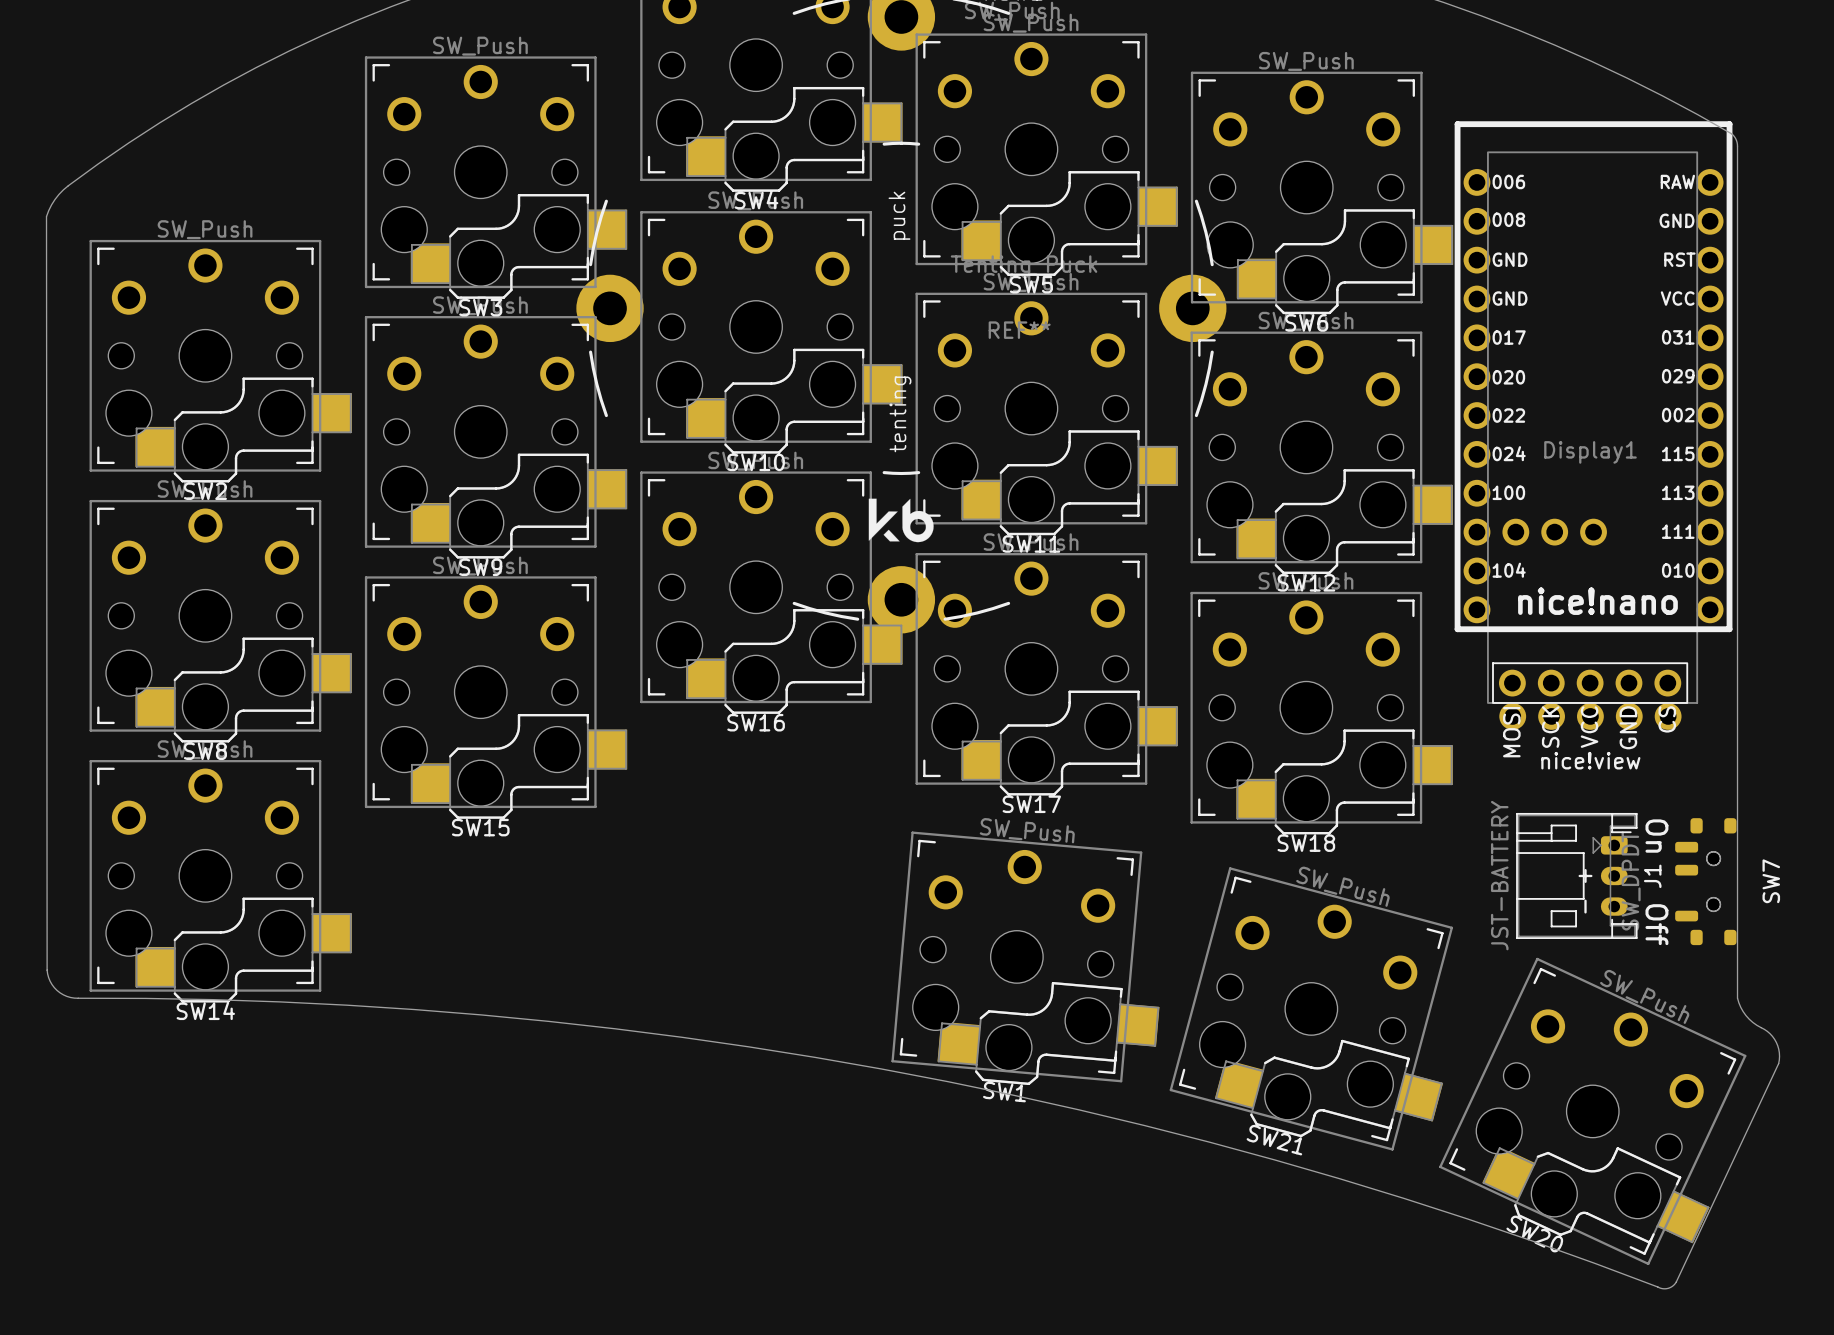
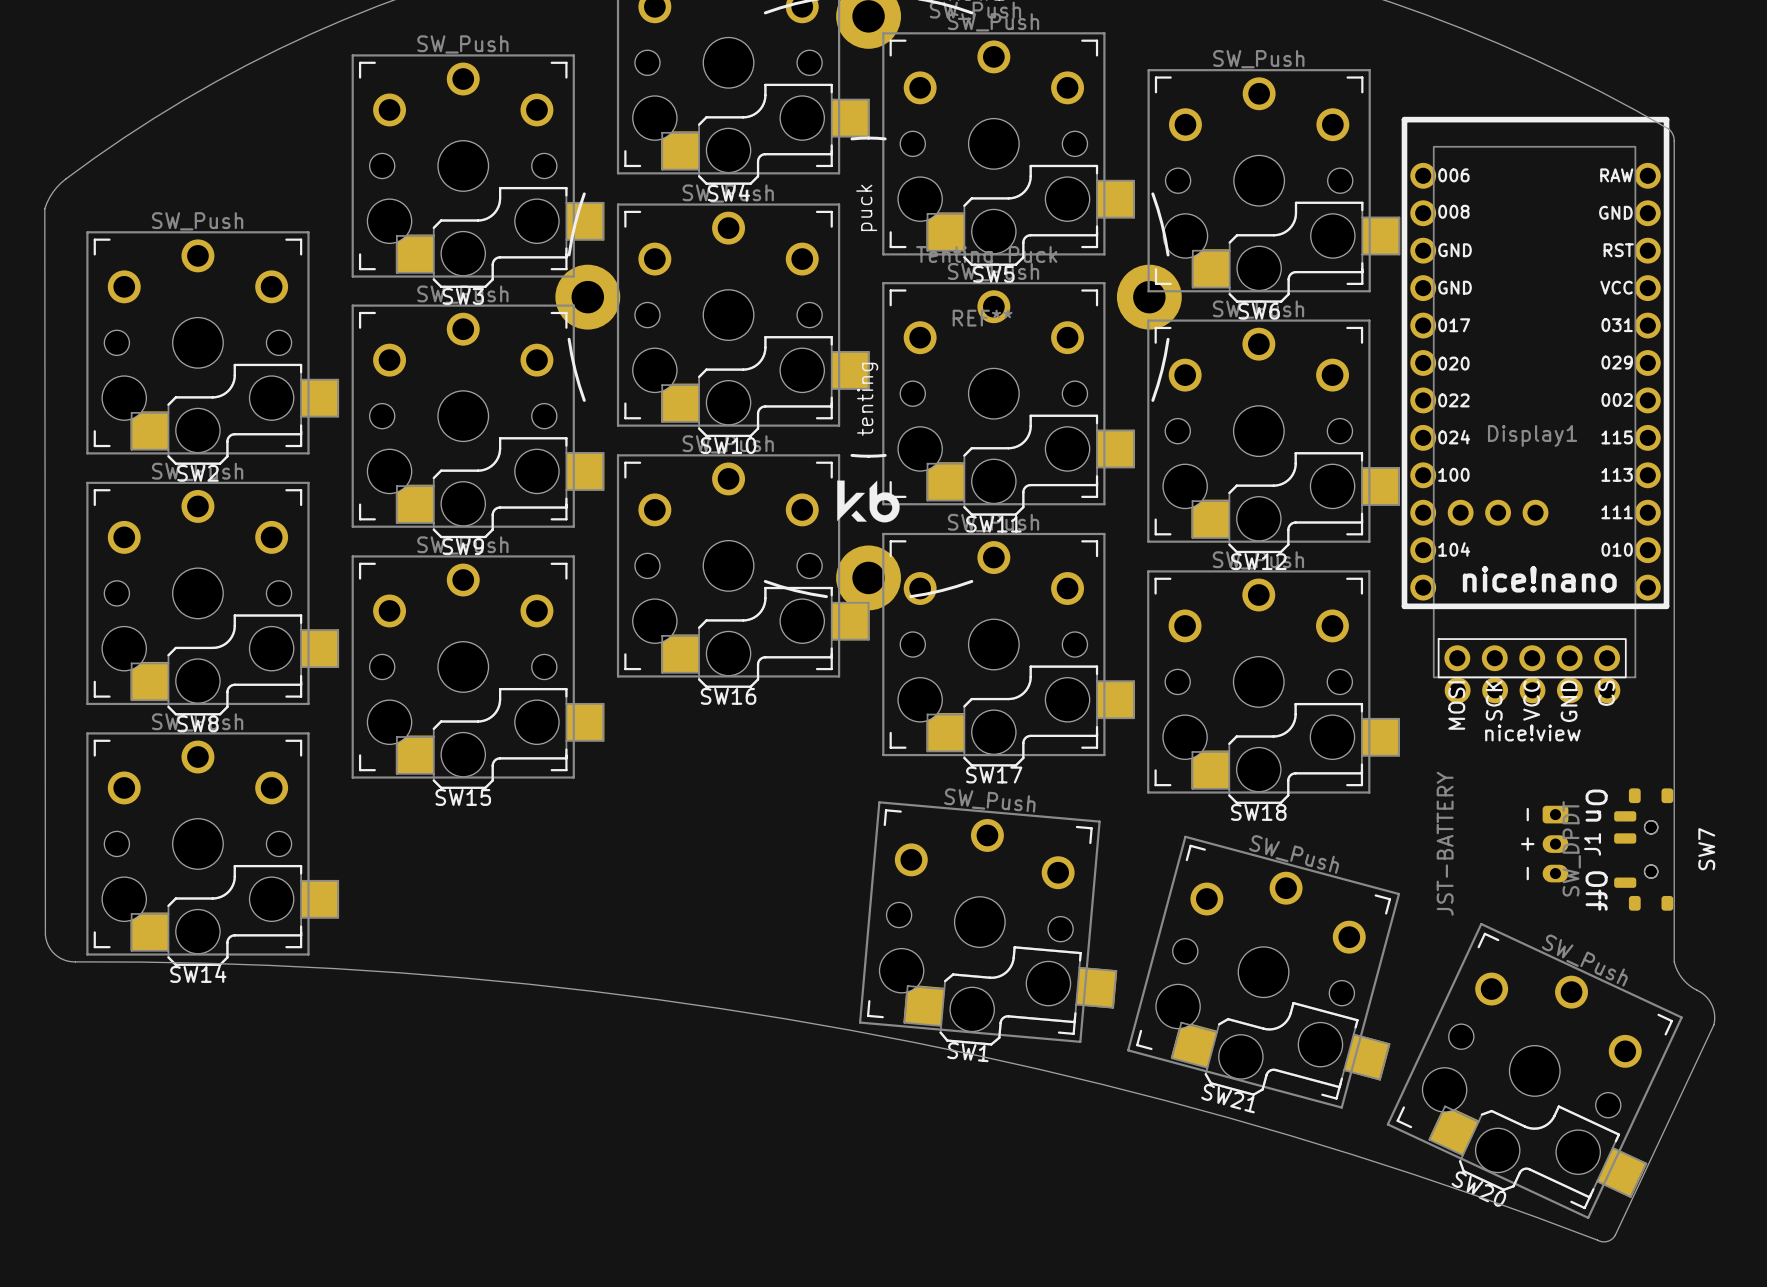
J1 footprint: [1516, 812, 1638, 939] -> [1542, 805, 1569, 883]

